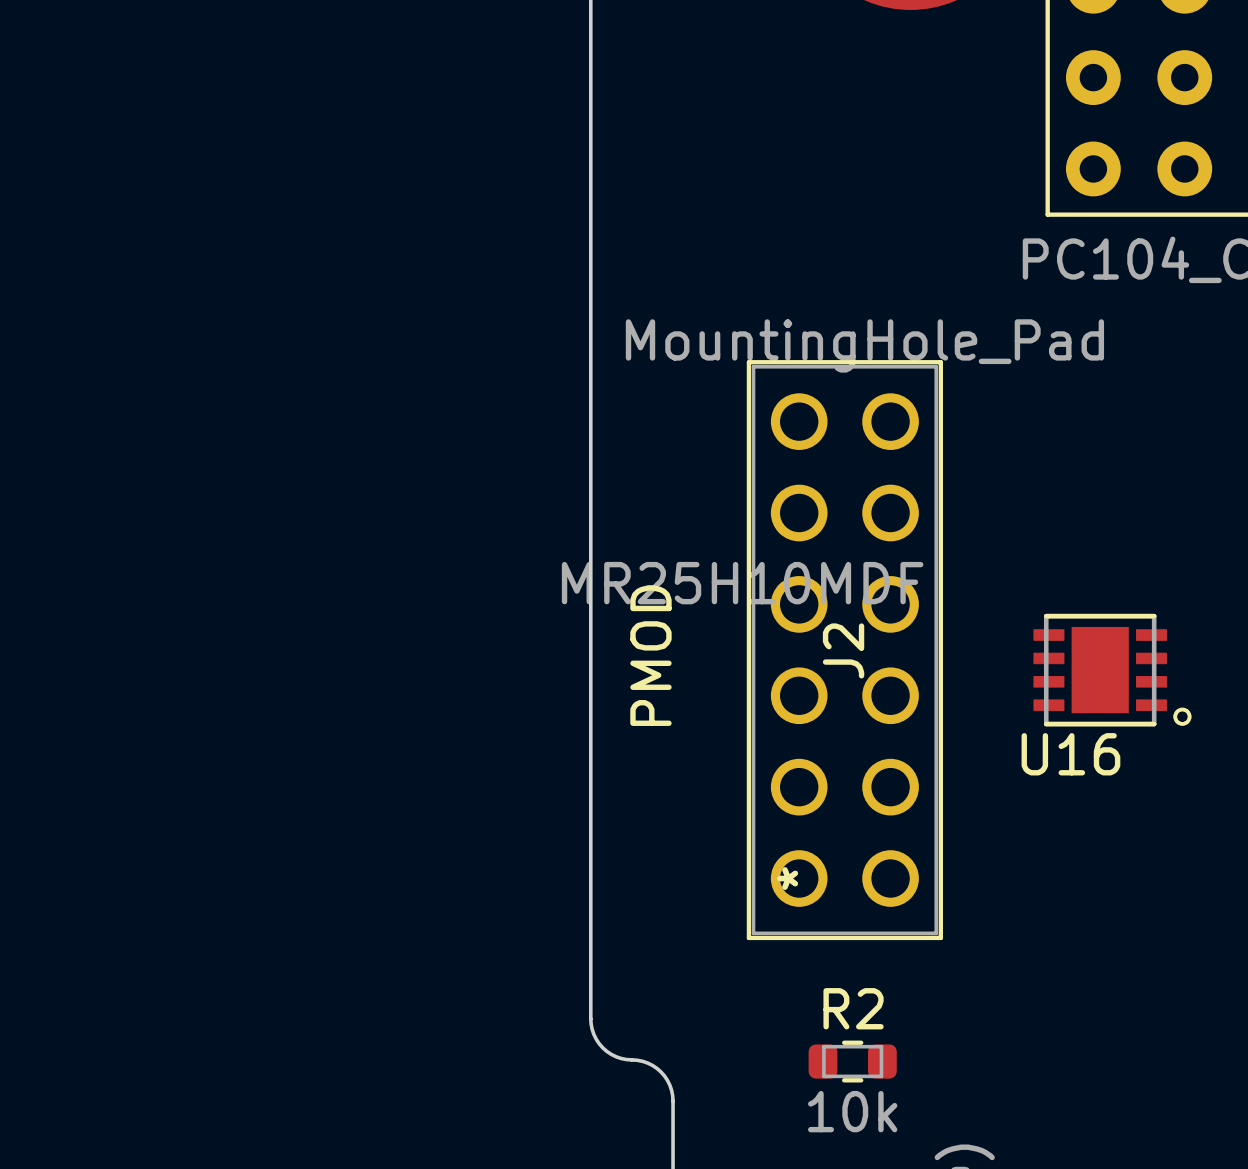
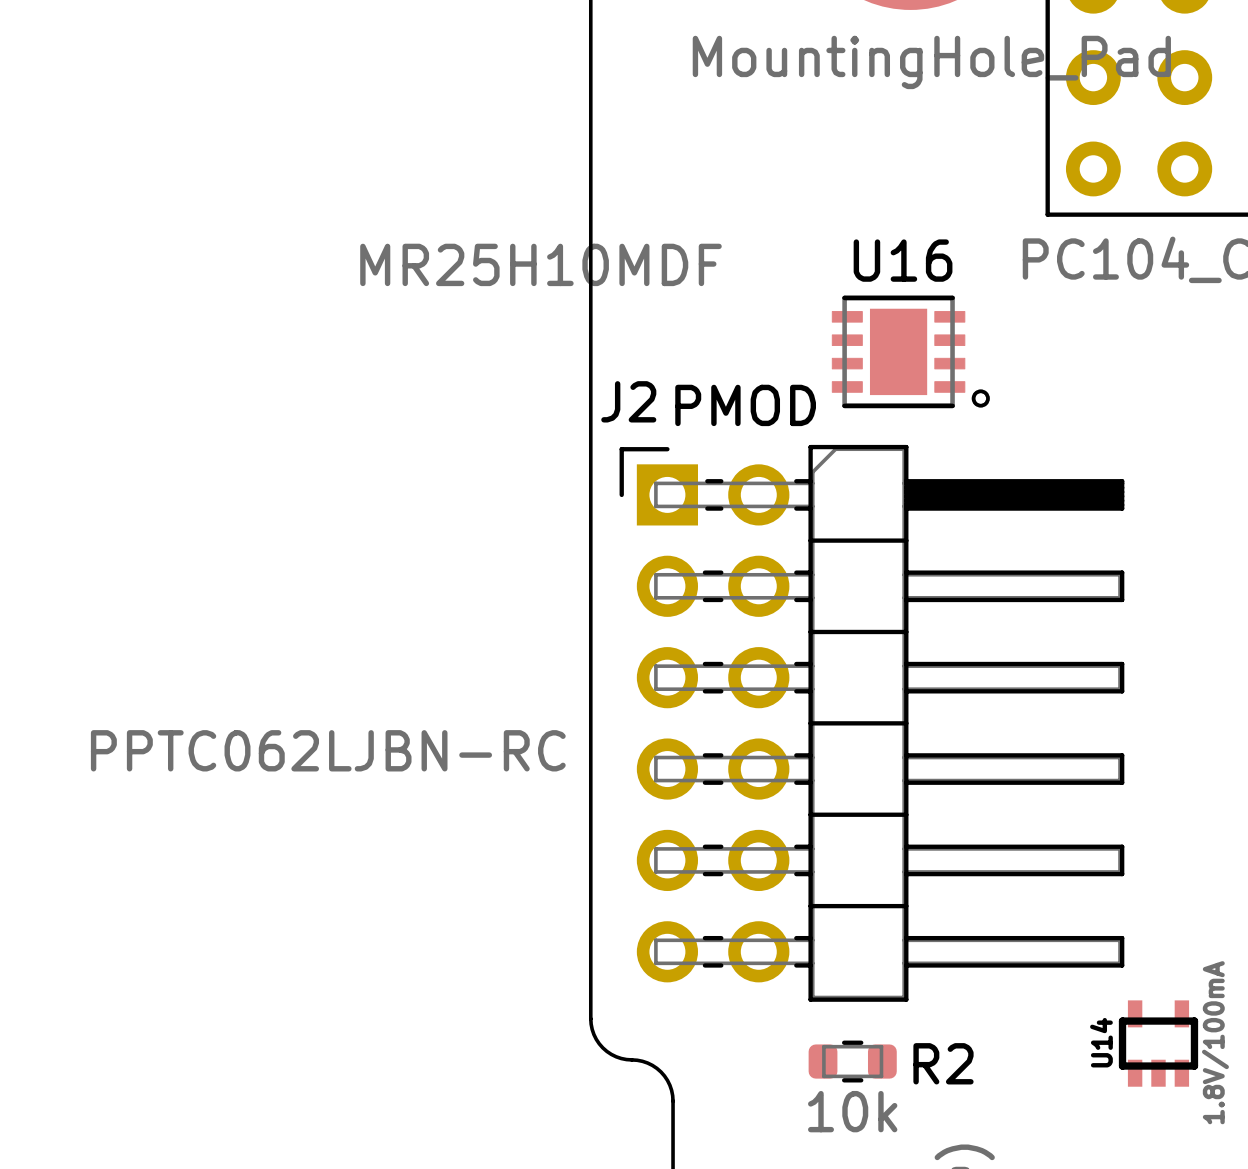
part value position: MountingHole_Pad (864, 345) -> MountingHole_Pad (931, 62)
J2 footprint: [746, 360, 943, 941] -> [619, 444, 1125, 1002]
J2 name position: J2 (843, 650) -> J2 (628, 401)
J2 value: PMOD (650, 655) -> PPTC062LJBN-RC (328, 750)
U16 position: (1112, 670) -> (910, 351)
U16 name position: U16 (1070, 754) -> U16 (903, 260)
R2 name position: R2 (853, 1008) -> R2 (943, 1063)
U14: none -> 1.8V/100mA (1158, 1043)

